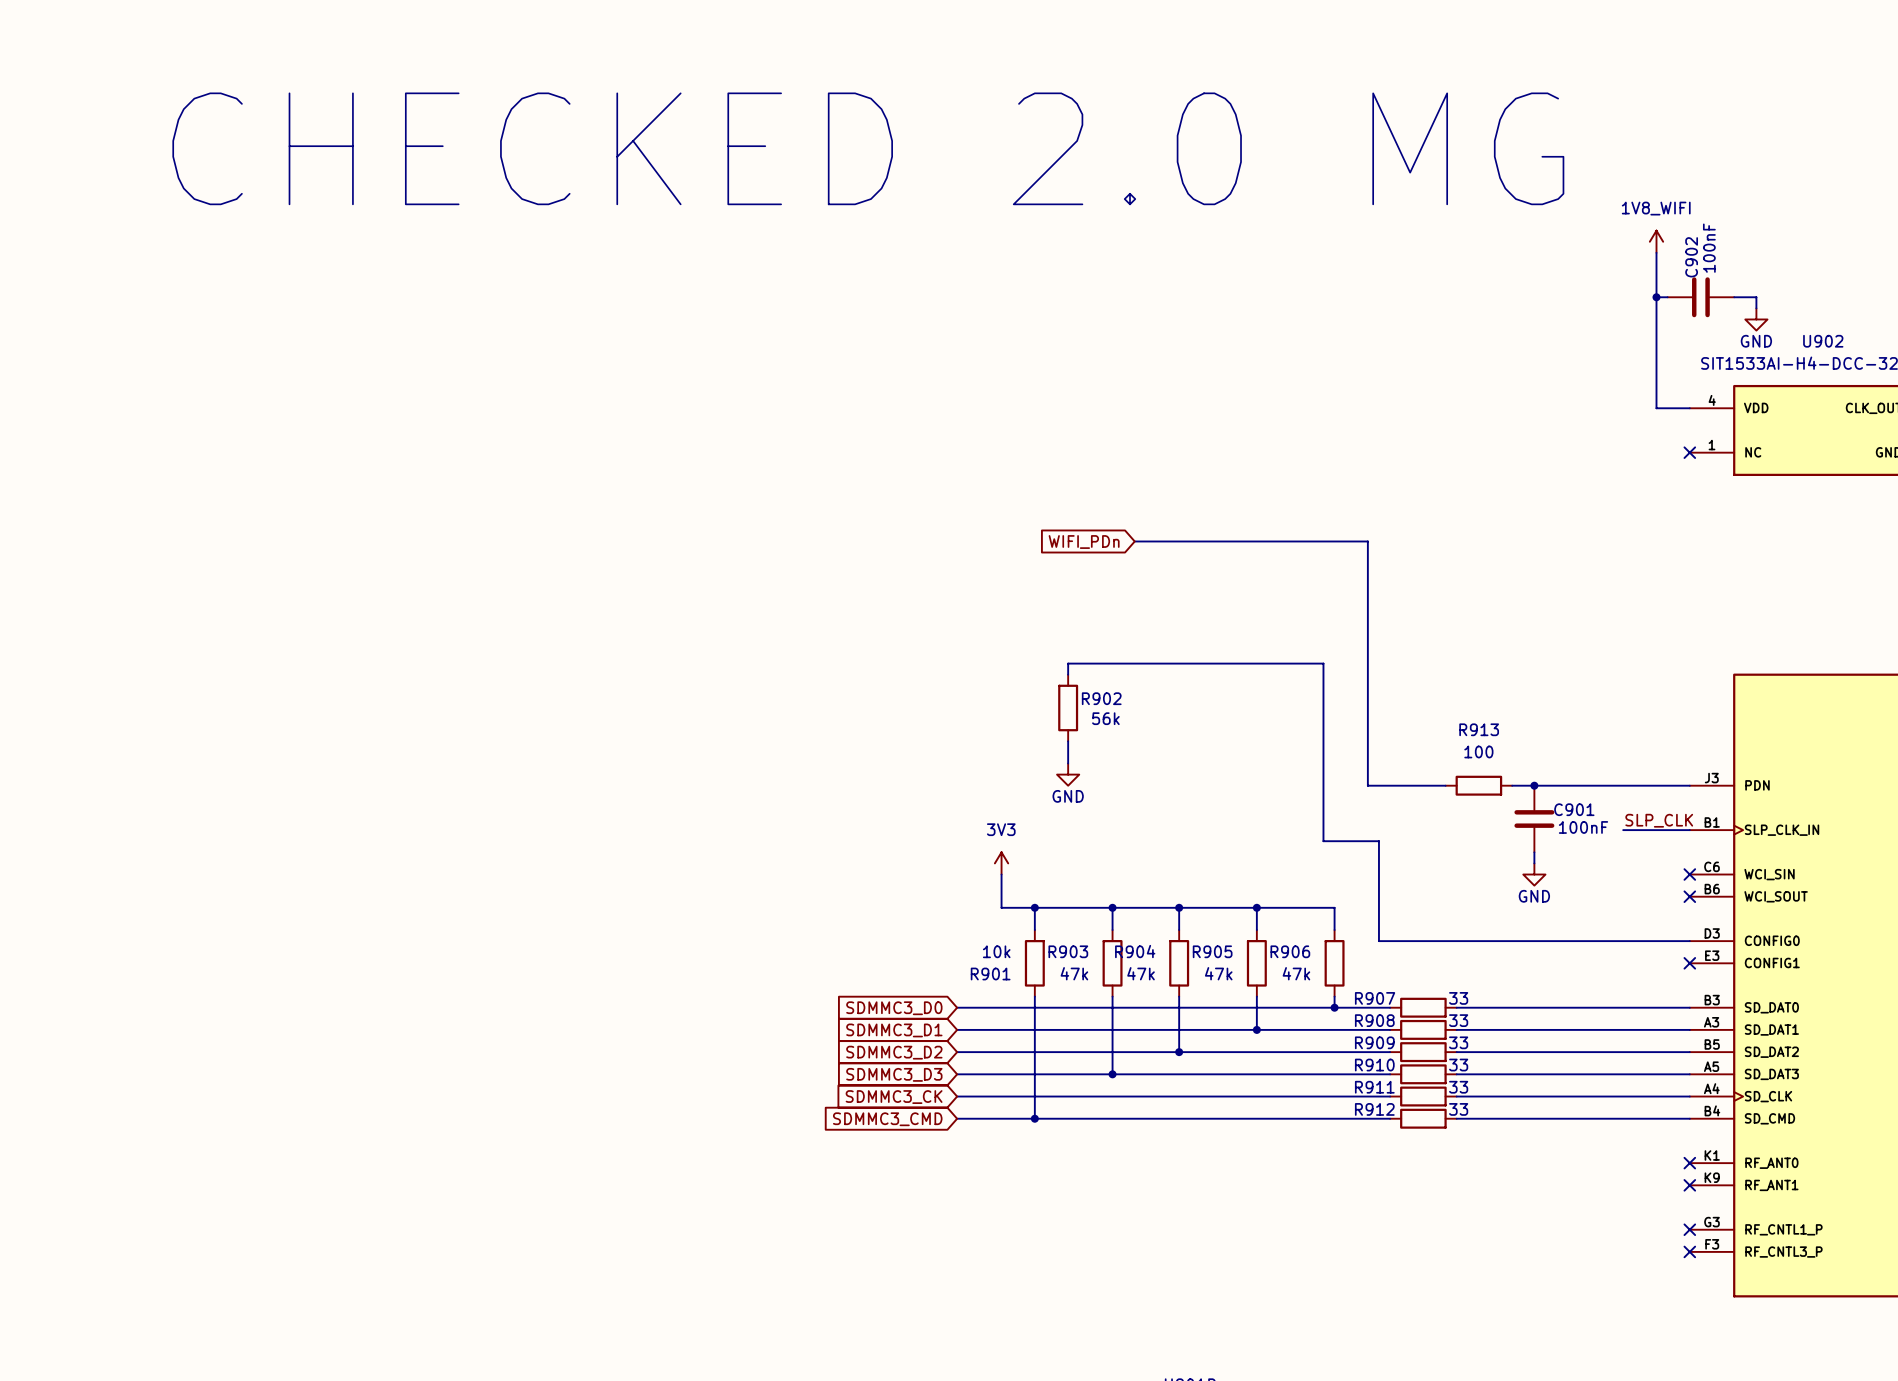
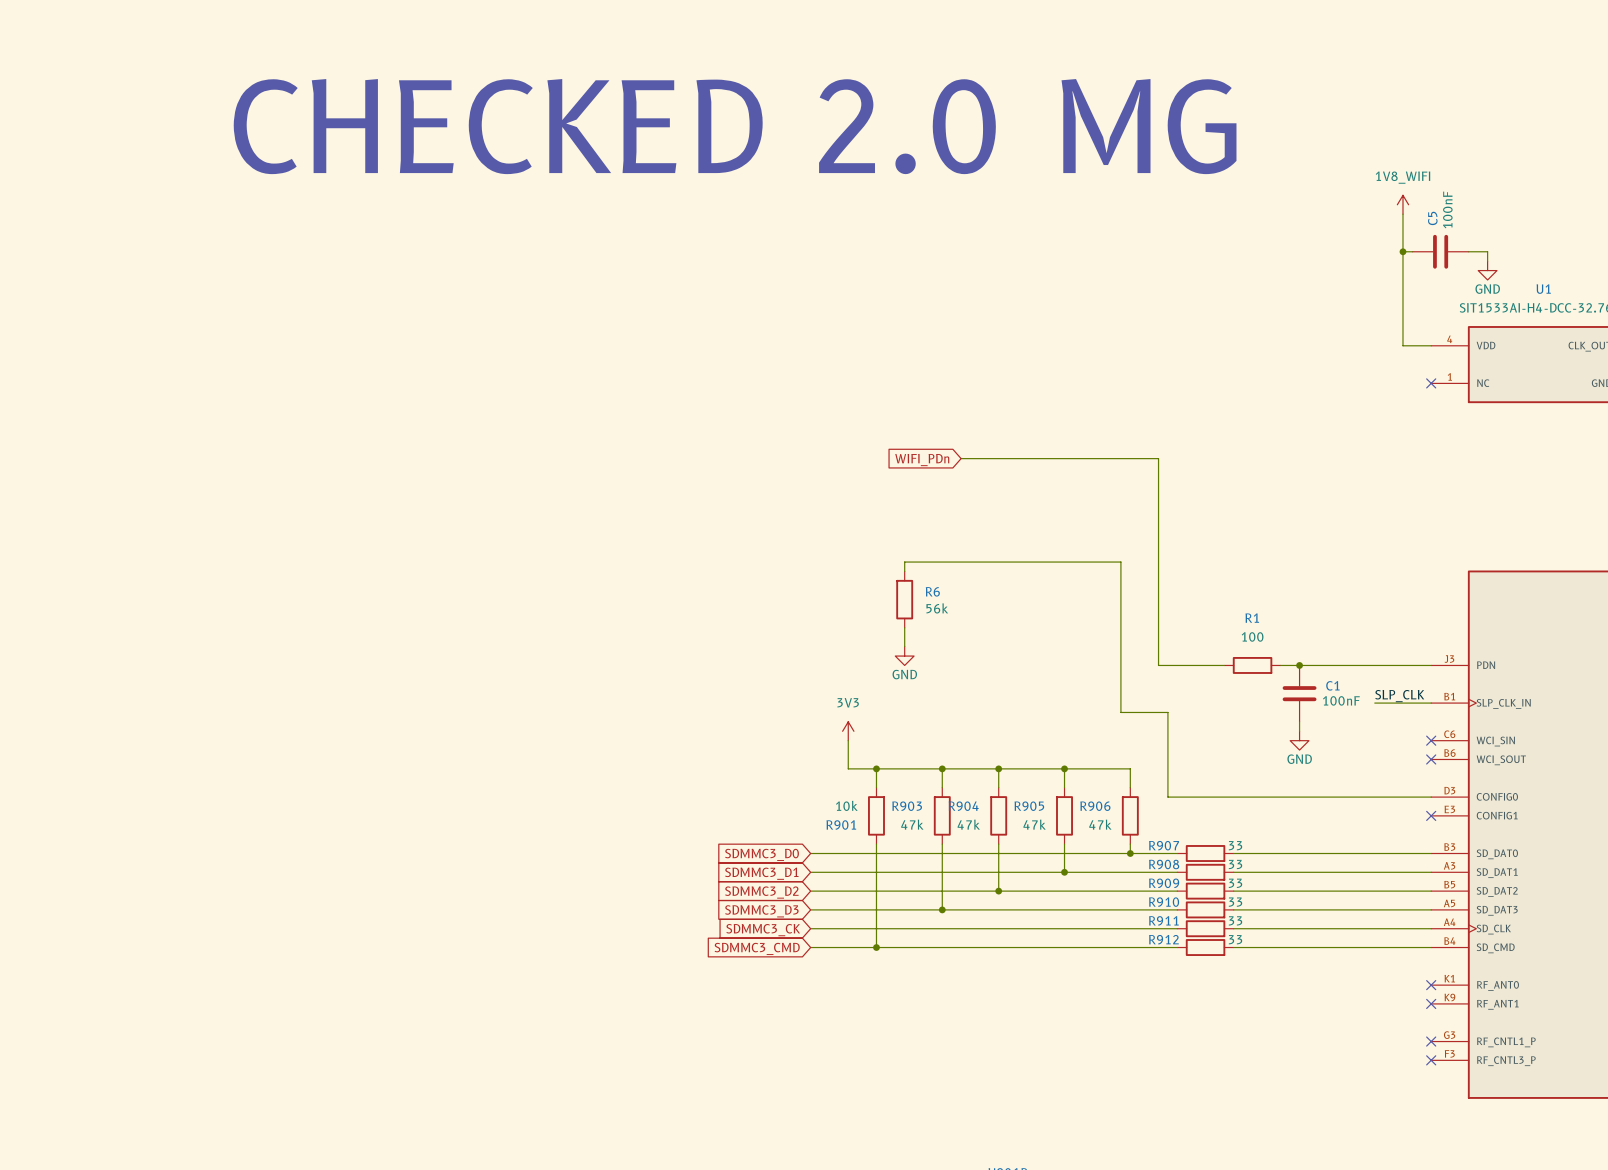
C902 name: C902 (1691, 257) -> C5 (1432, 218)
U902 name: U902 (1823, 341) -> U1 (1543, 289)
R902 name: R902 (1101, 698) -> R6 (932, 591)
R913 name: R913 (1479, 729) -> R1 (1252, 618)
C901 name: C901 (1574, 809) -> C1 (1332, 685)

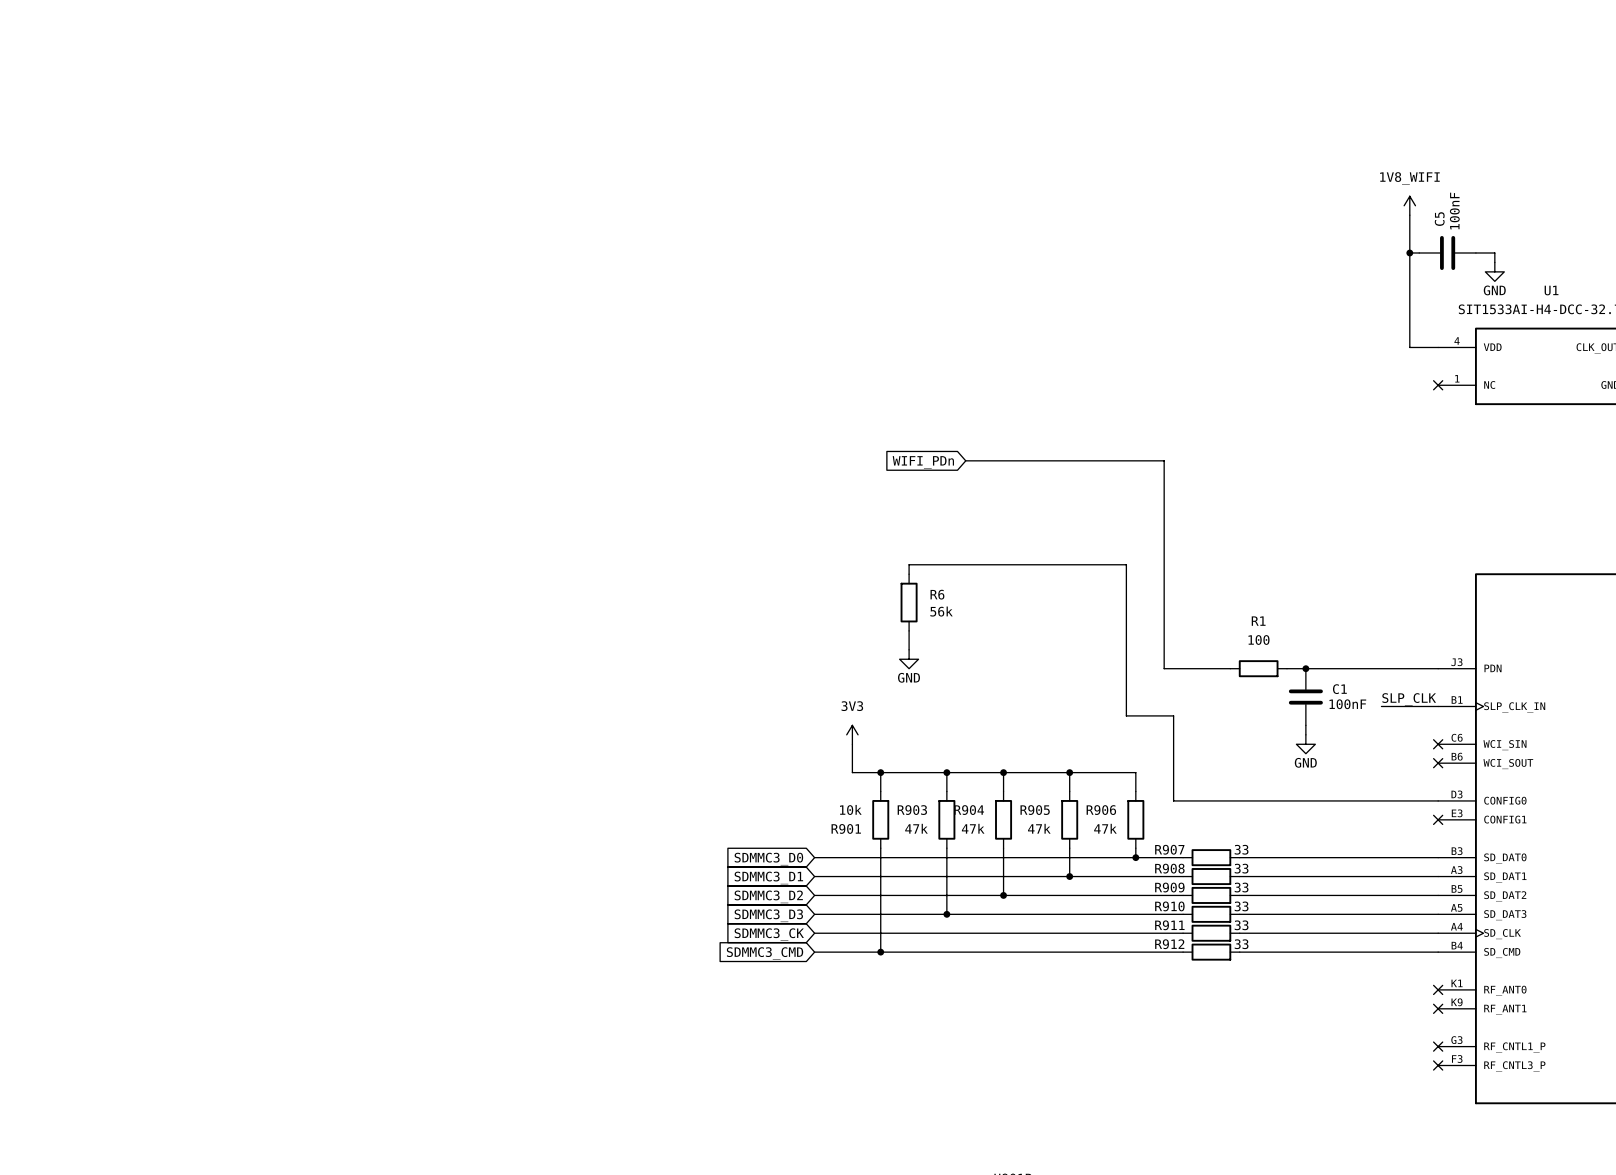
text: CHECKED 2.0 MG (735, 126) -> none

